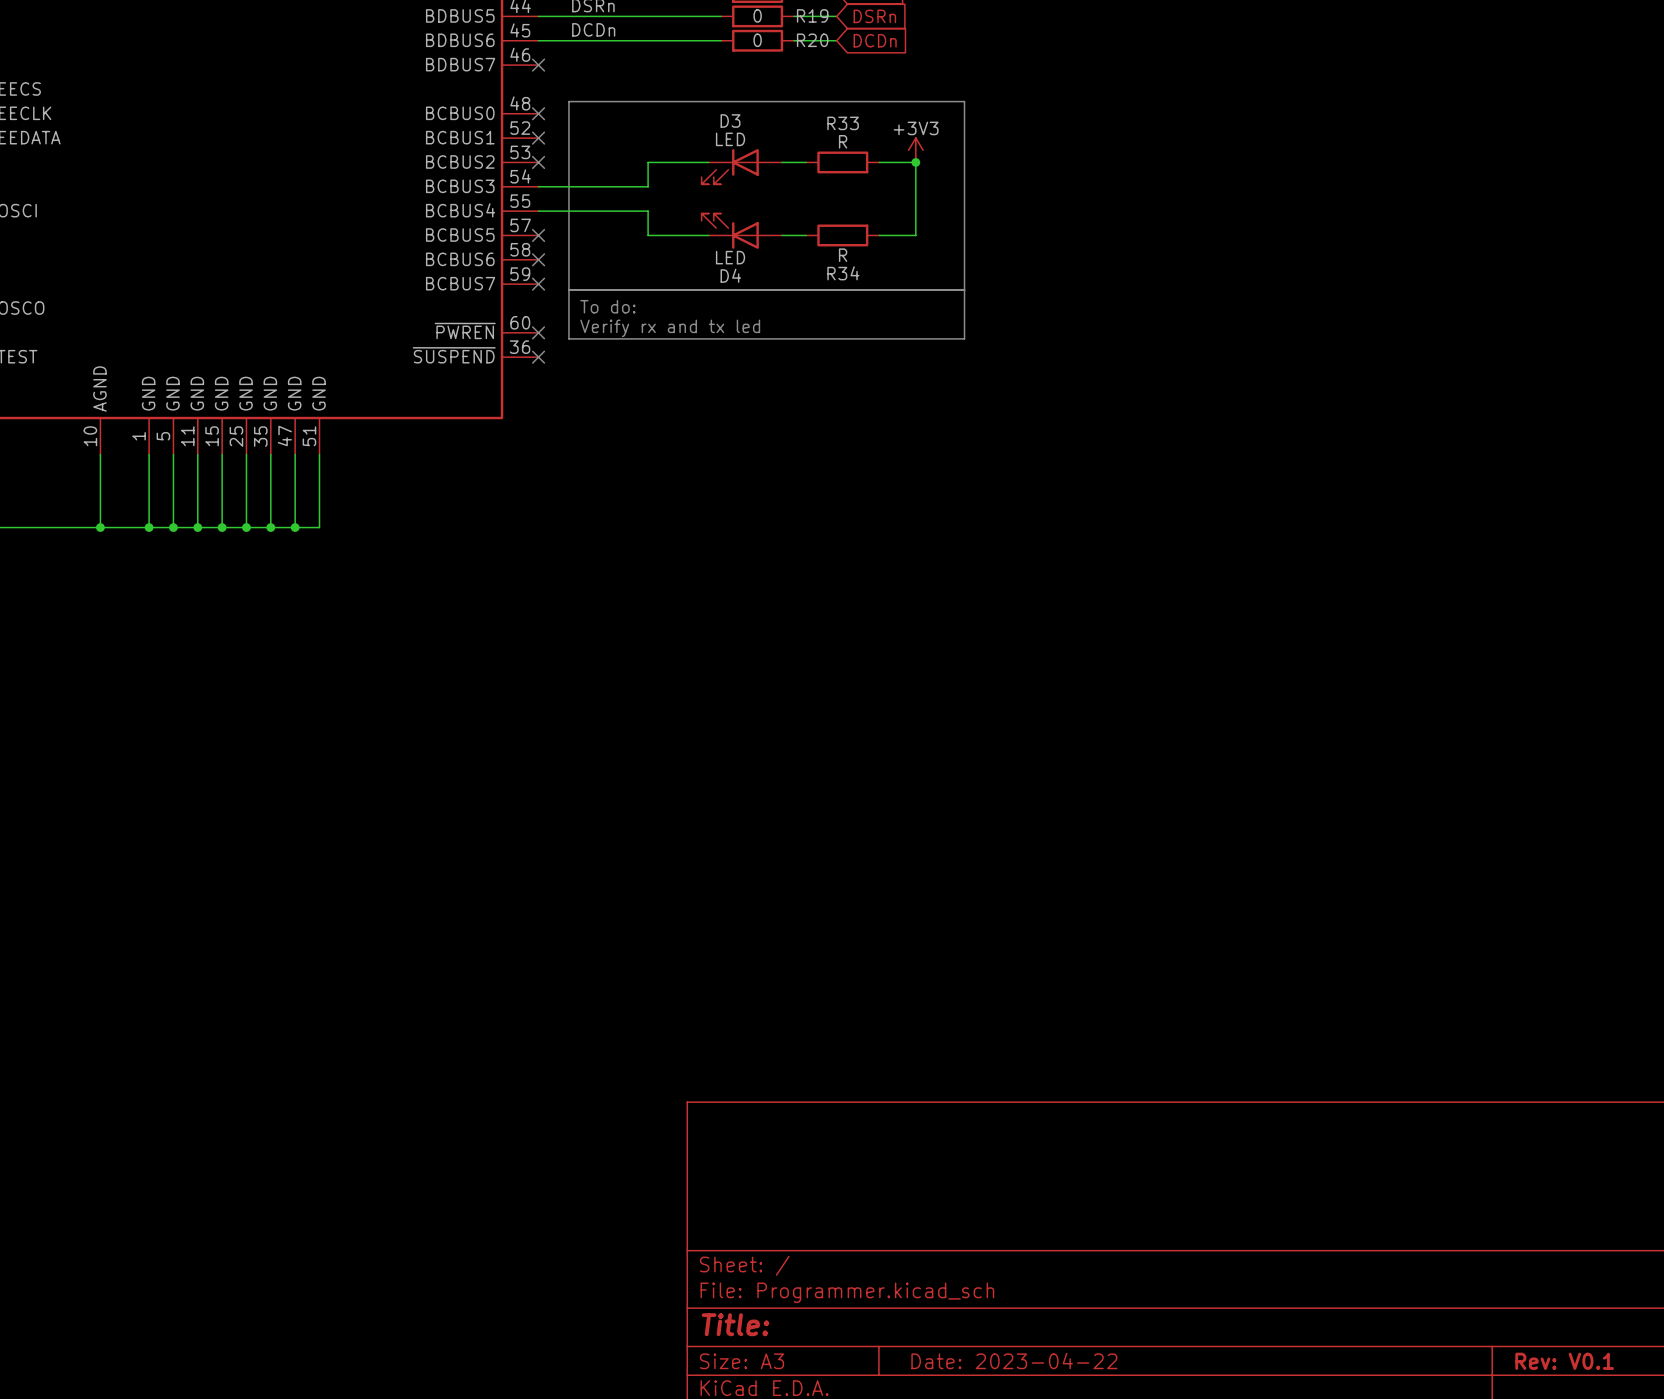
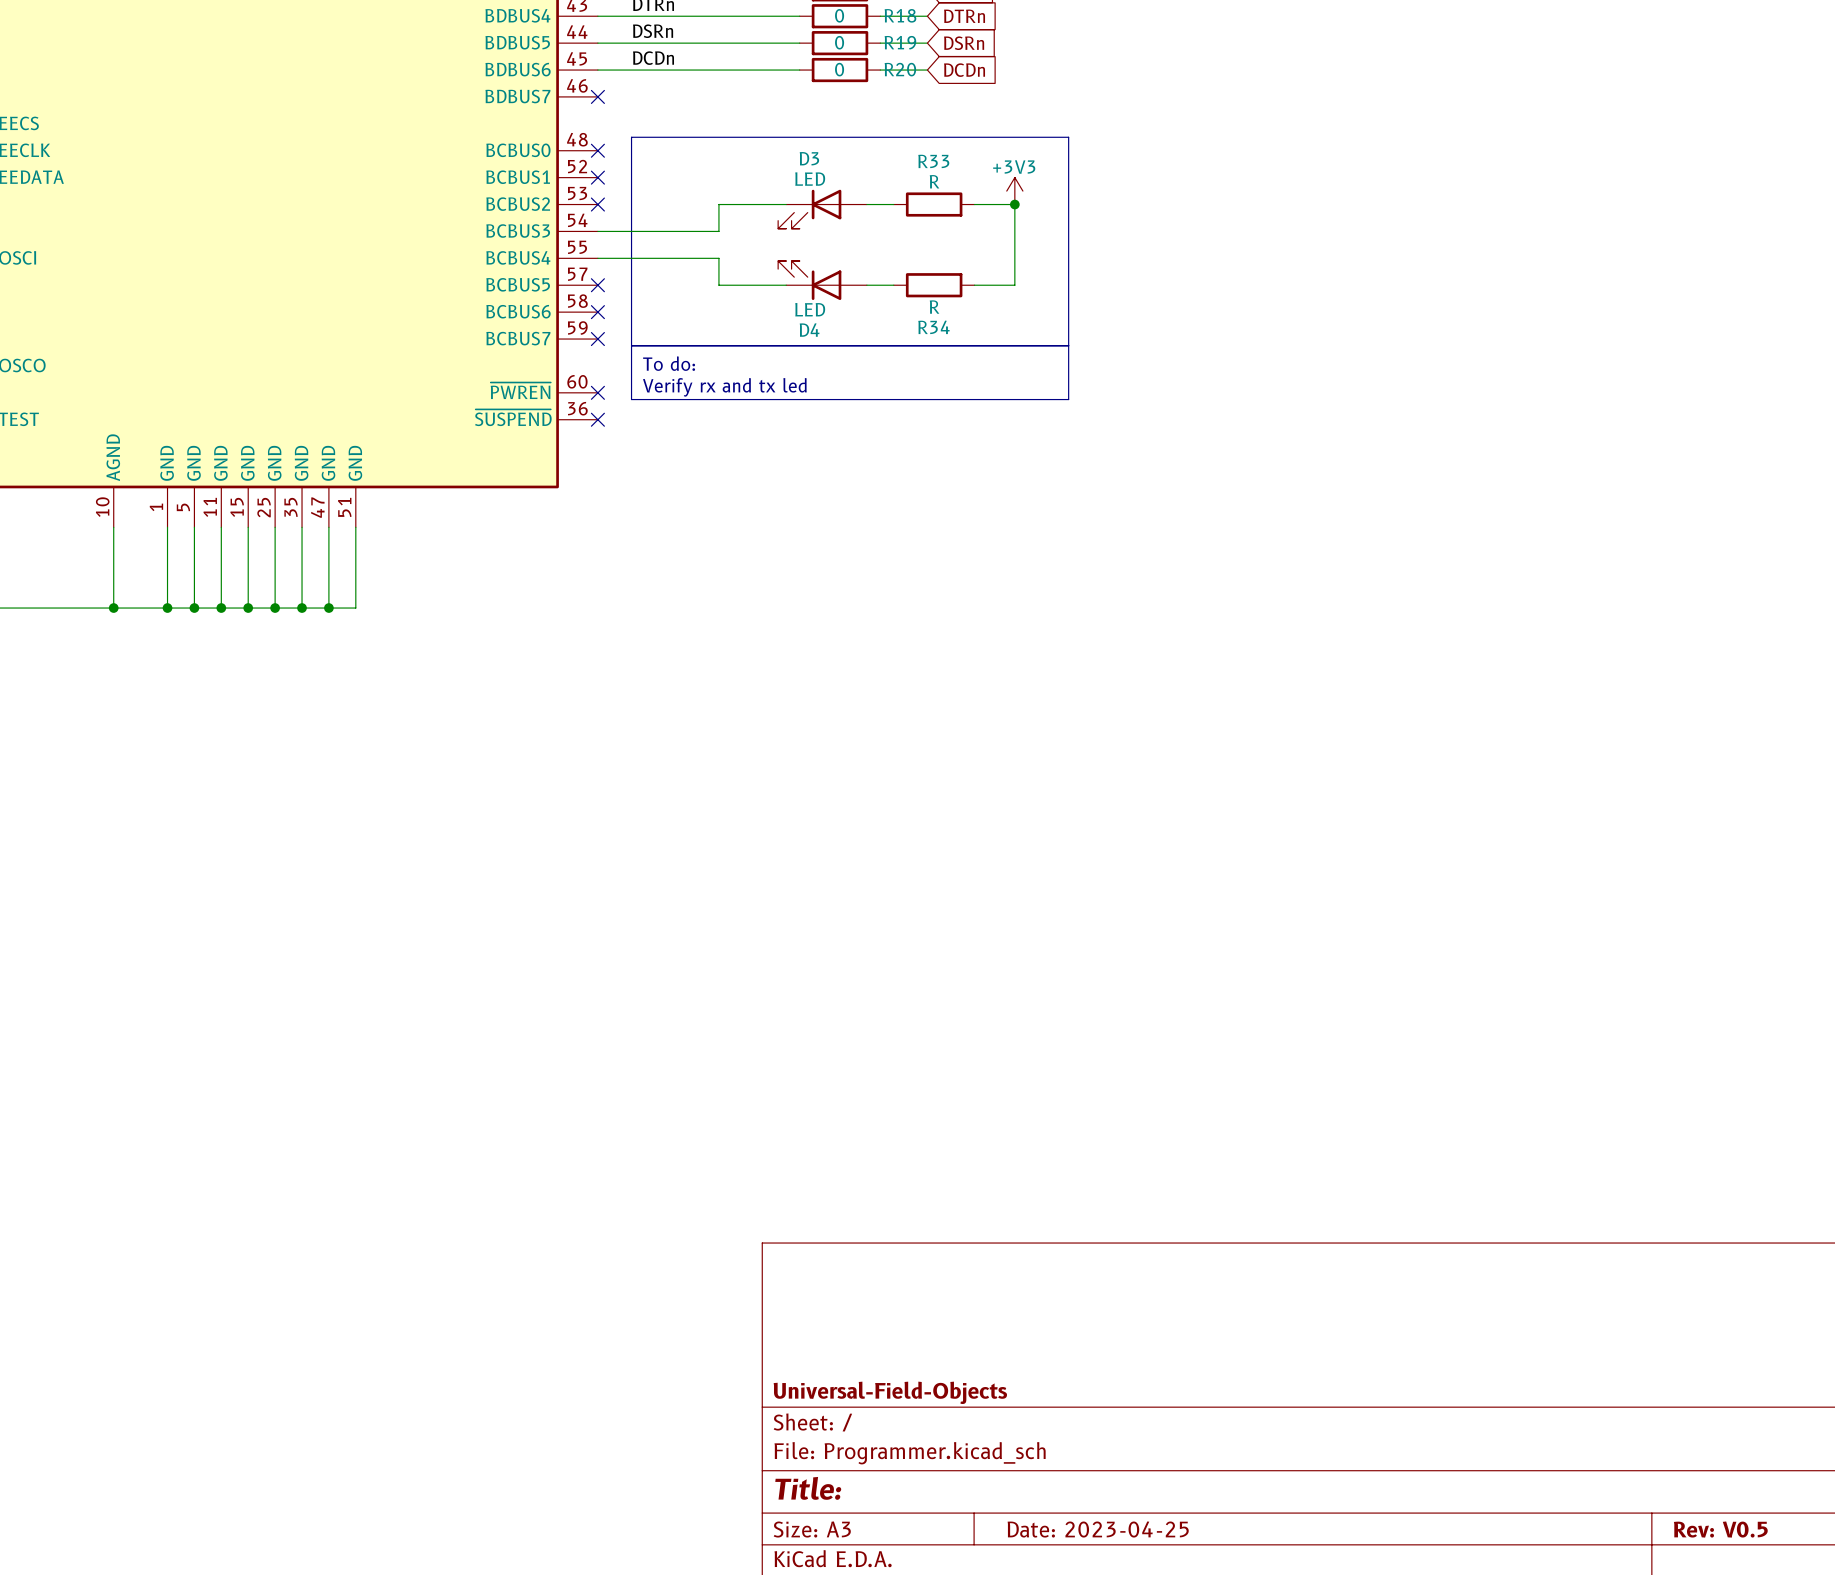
title block: none -> Universal-Field-Objects (890, 1392)
title block: Date: 2023-04-22 (1014, 1360) -> Date: 2023-04-25 (1098, 1529)
title block: Rev: V0.1 (1564, 1361) -> Rev: V0.5 (1720, 1529)

